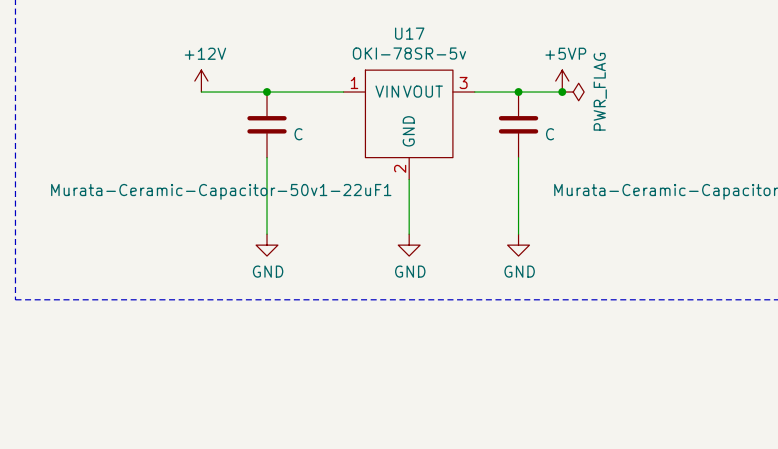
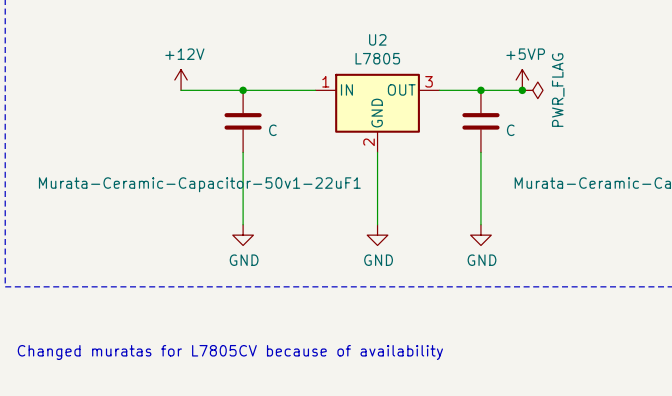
U2: none -> L7805 (377, 113)
U17: OKI-78SR-5v (409, 124) -> none
text: none -> Changed muratas for L7805CV because of availability (230, 352)

